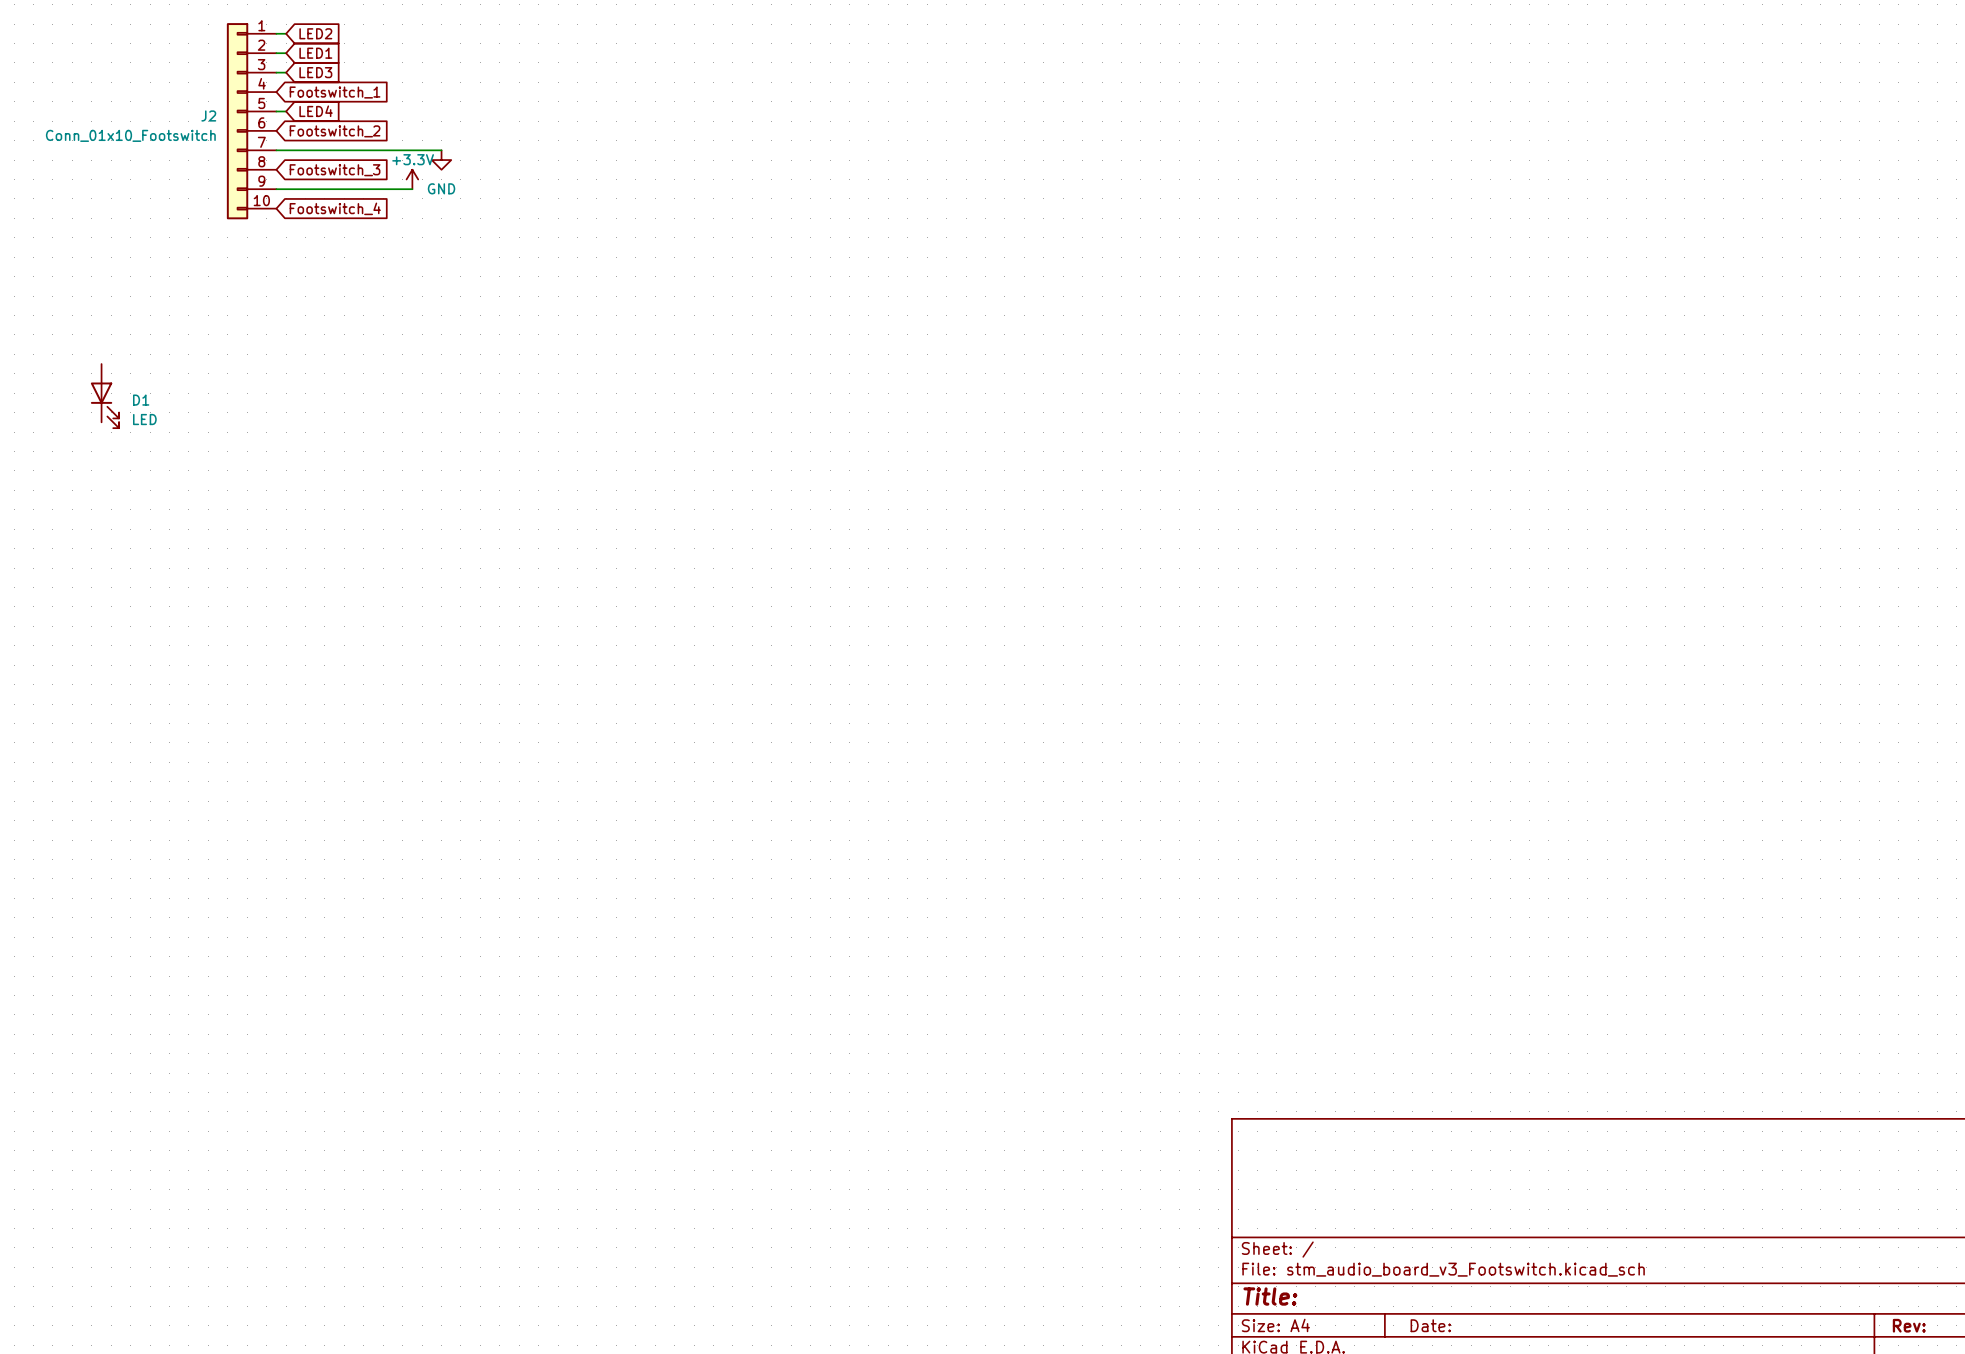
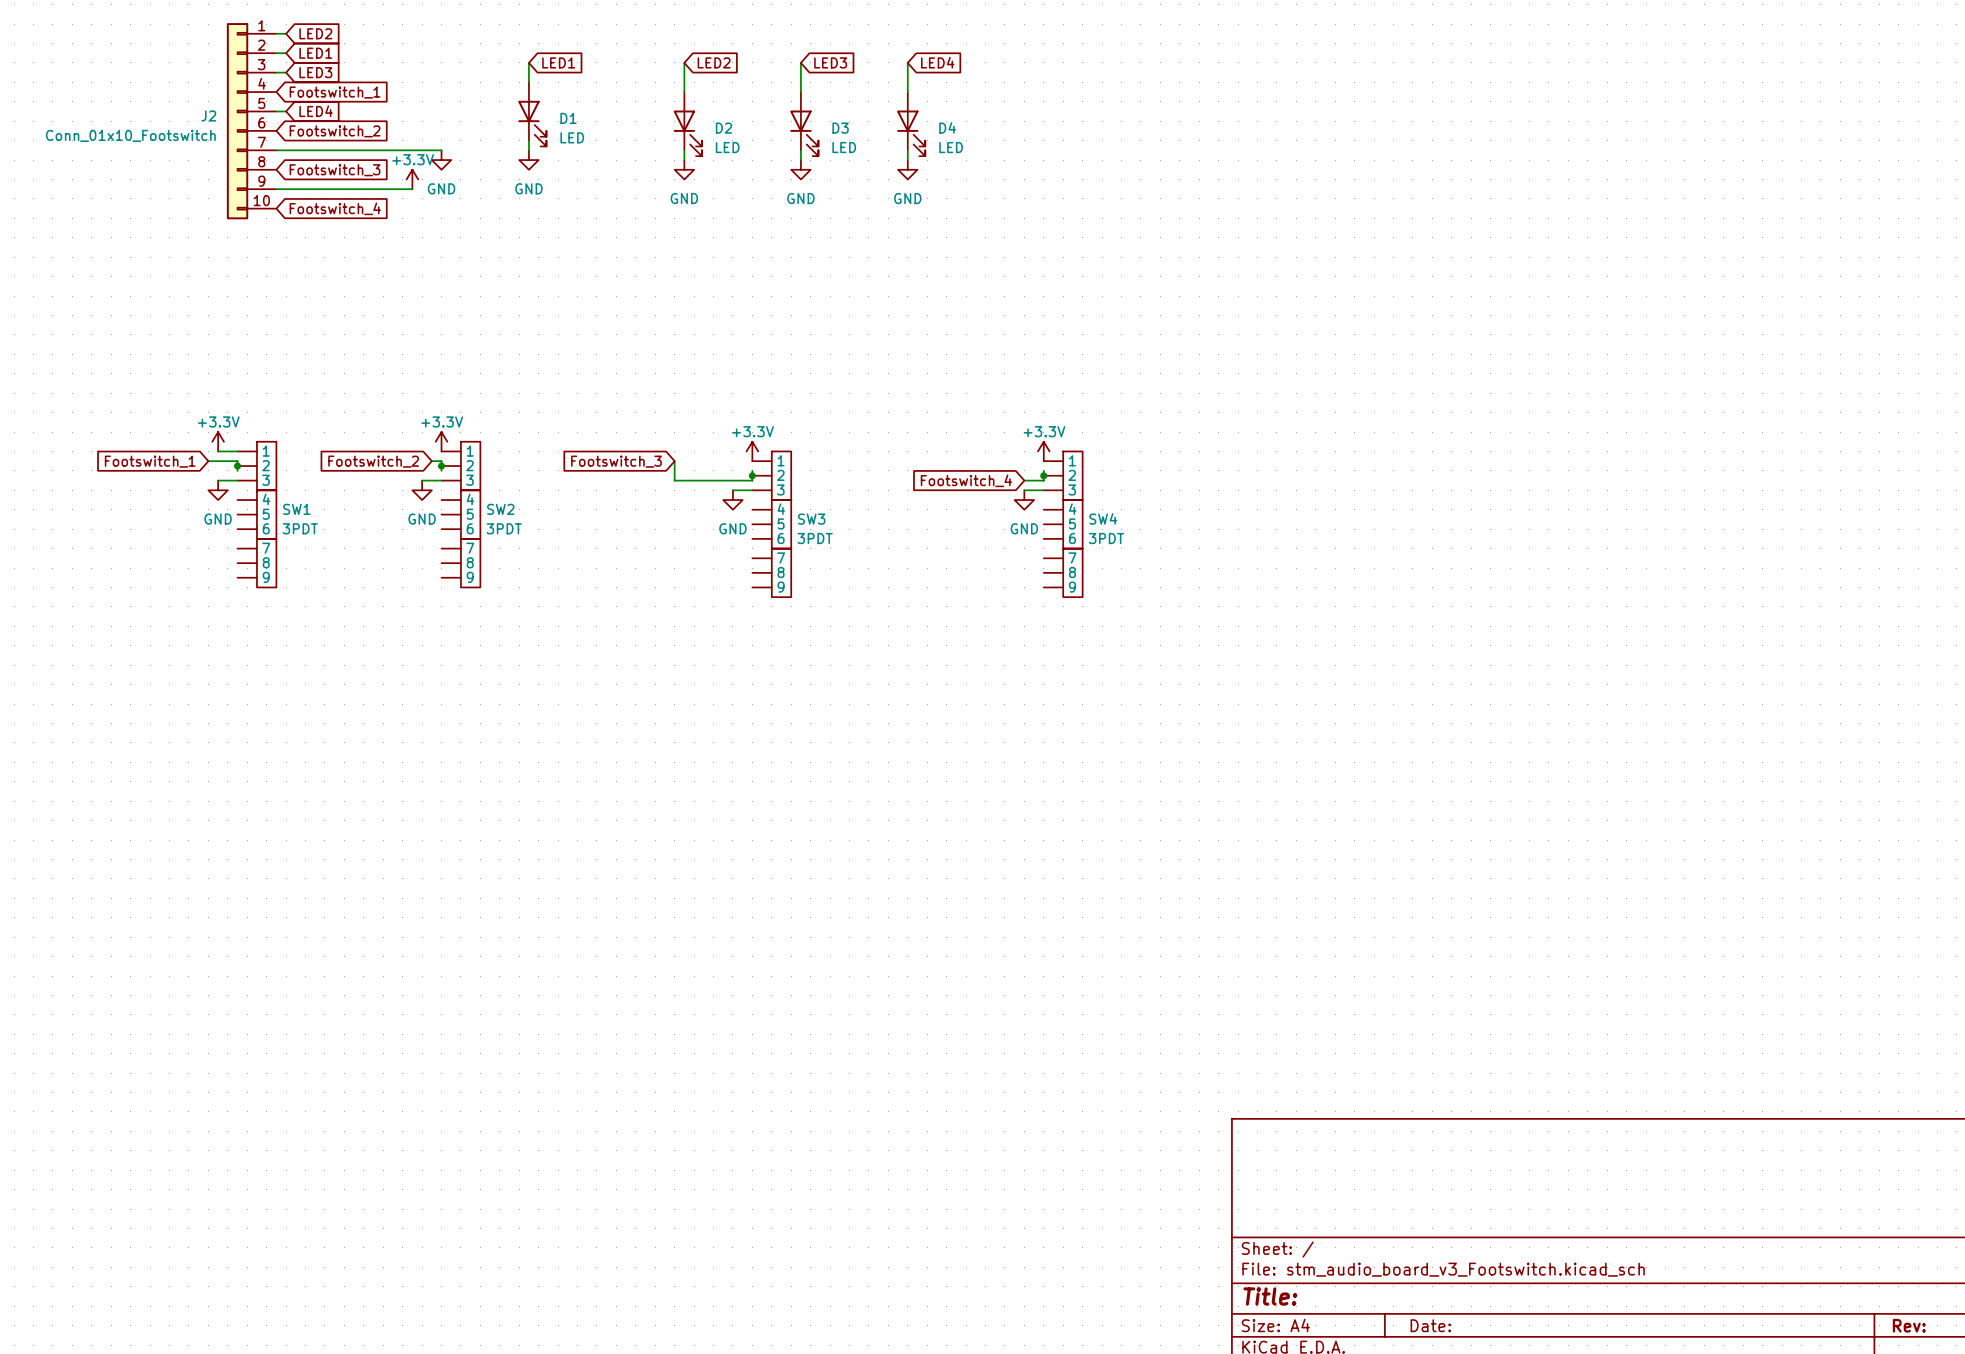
wire: none -> (528, 62) (528, 82)
global label: none -> LED1 (558, 62)
wire: none -> (684, 62) (684, 92)
global label: none -> LED2 (714, 62)
wire: none -> (800, 62) (800, 92)
global label: none -> LED3 (830, 62)
wire: none -> (907, 62) (907, 92)
global label: none -> LED4 (937, 62)
D2: none -> LED (687, 124)
D3: none -> LED (804, 124)
D4: none -> LED (911, 124)
wire: none -> (528, 140) (528, 150)
wire: none -> (684, 150) (684, 160)
wire: none -> (800, 150) (800, 160)
wire: none -> (907, 150) (907, 160)
power symbol: none -> GND (528, 160)
power symbol: none -> GND (684, 169)
power symbol: none -> GND (800, 169)
power symbol: none -> GND (907, 169)
D1 position: (104, 396) -> (532, 114)
power symbol: none -> +3.3V (218, 441)
power symbol: none -> +3.3V (441, 441)
wire: none -> (218, 451) (237, 451)
power symbol: none -> +3.3V (752, 451)
power symbol: none -> +3.3V (1043, 451)
global label: none -> Footswitch_1 (150, 461)
wire: none -> (208, 461) (237, 461) (237, 470)
global label: none -> Footswitch_2 (373, 461)
wire: none -> (431, 461) (441, 461) (441, 470)
global label: none -> Footswitch_3 (616, 461)
wire: none -> (674, 461) (674, 480) (752, 480) (752, 470)
junction: none -> (237, 466)
junction: none -> (441, 466)
wire: none -> (1043, 470) (1043, 480) (1024, 480)
junction: none -> (752, 475)
junction: none -> (1043, 475)
wire: none -> (218, 480) (237, 480)
wire: none -> (422, 480) (441, 480)
global label: none -> Footswitch_4 (966, 480)
power symbol: none -> GND (218, 490)
power symbol: none -> GND (422, 490)
wire: none -> (732, 490) (752, 490)
wire: none -> (1024, 490) (1043, 490)
power symbol: none -> GND (732, 500)
power symbol: none -> GND (1024, 500)
SW1: none -> 3PDT (256, 514)
SW2: none -> 3PDT (460, 514)
SW3: none -> 3PDT (771, 524)
SW4: none -> 3PDT (1063, 524)

